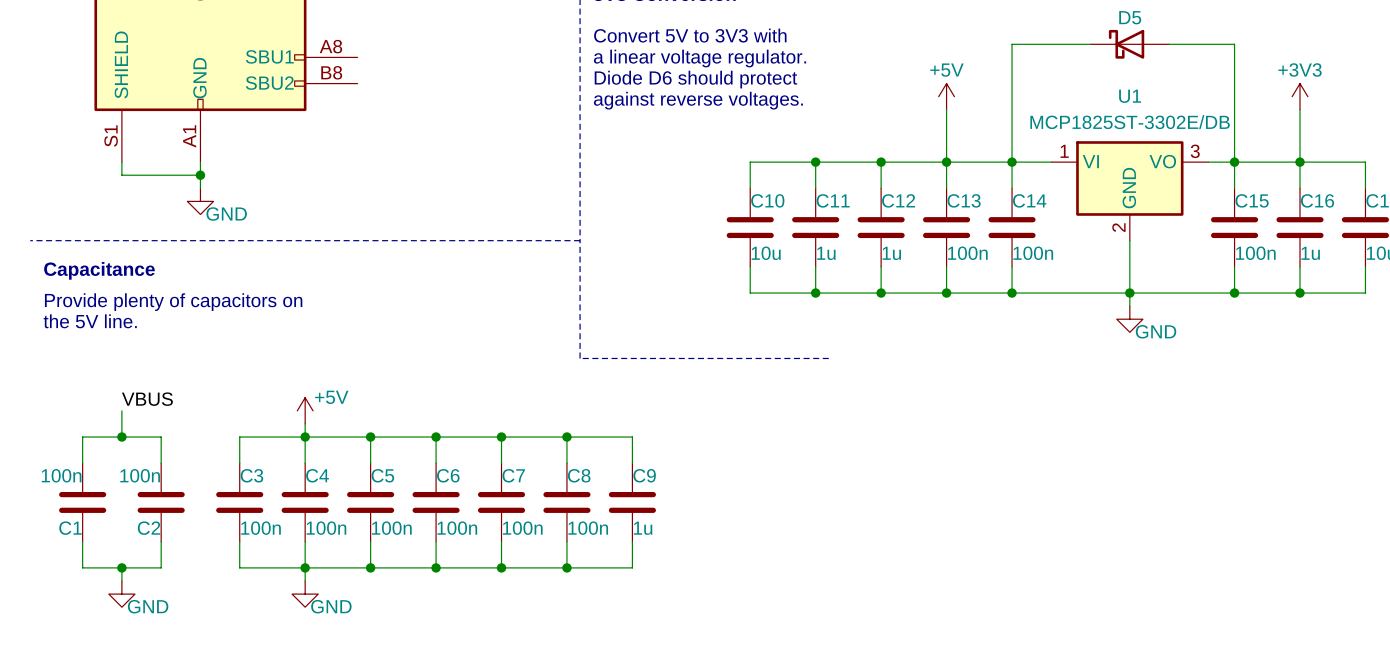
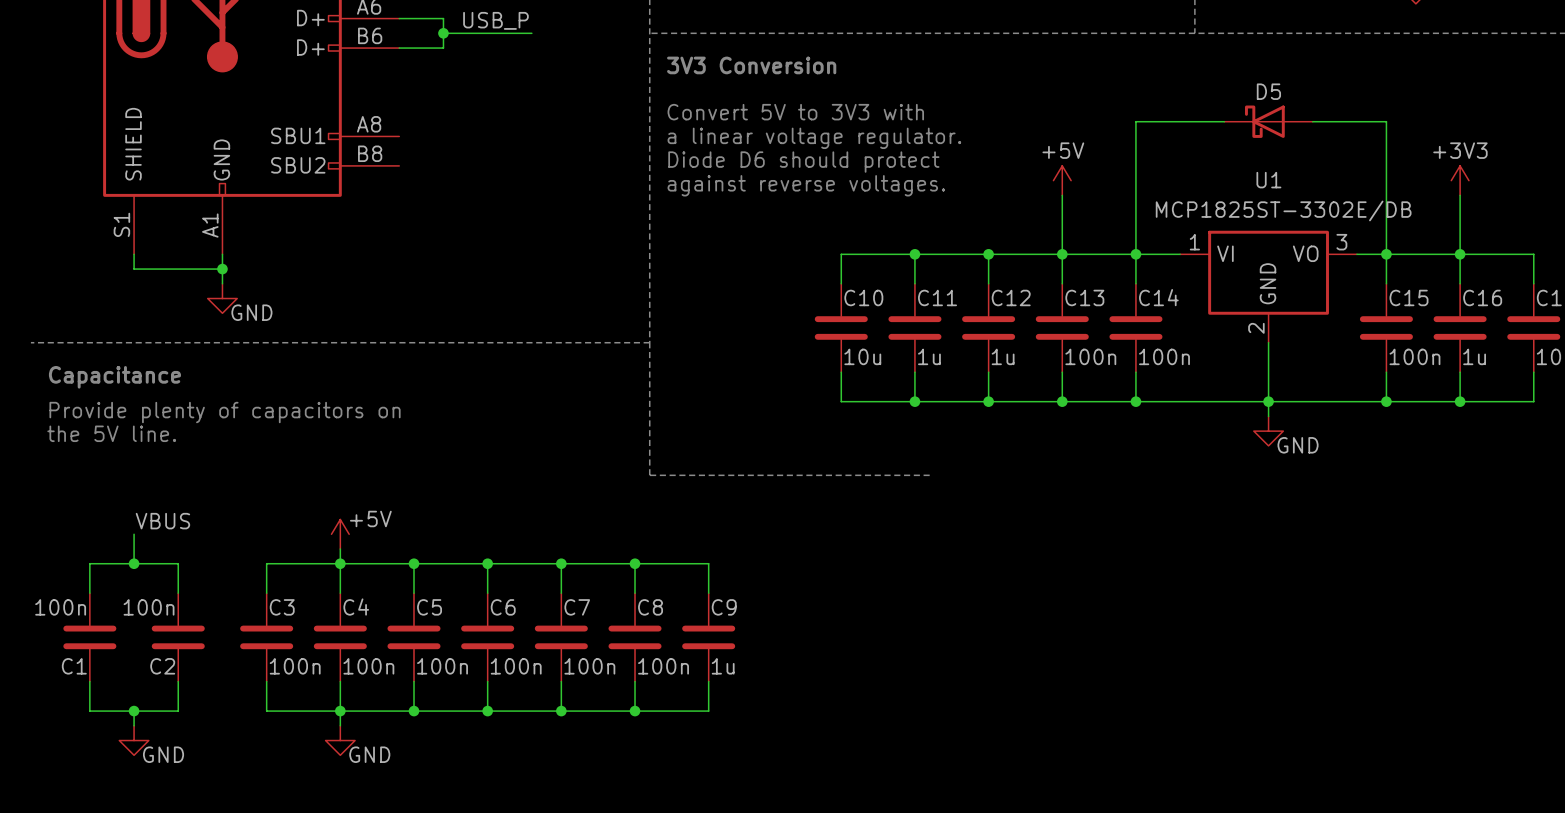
U1 value: MCP1825ST-3302E/DB (1130, 122) -> none
U1 text: none -> MCP1825ST-3302E/DB (1283, 210)

